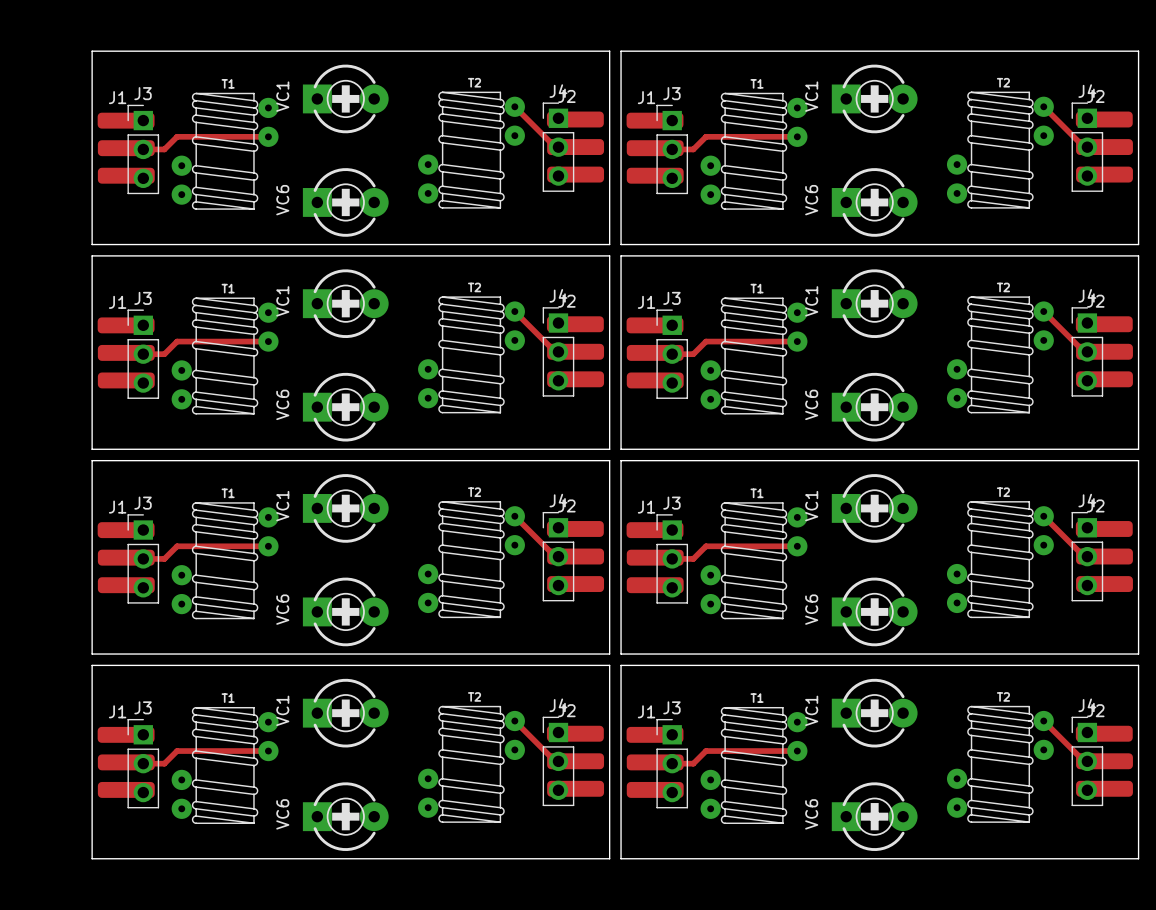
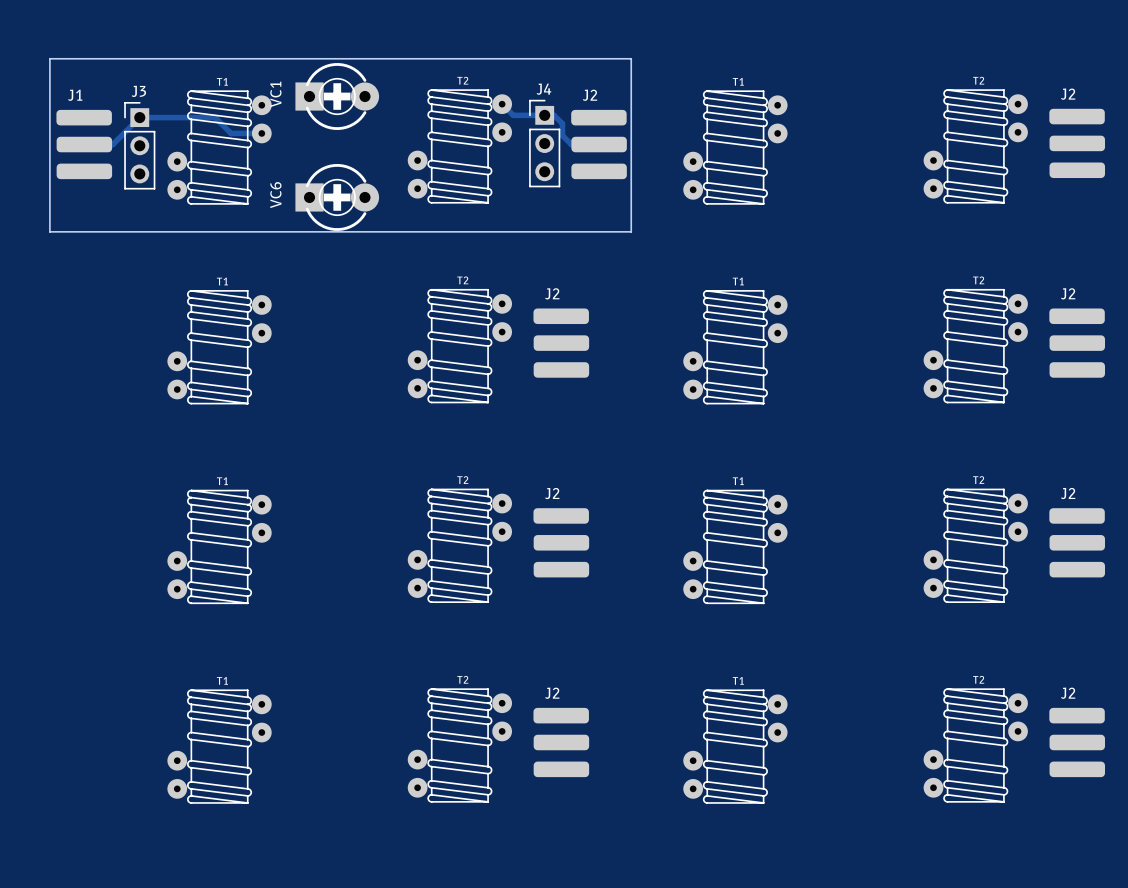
board edge: (92, 51) (92, 244) (609, 244) (609, 51) (92, 51) -> (49, 58) (49, 231) (631, 231) (631, 58) (49, 58)
board edge: (621, 51) (621, 244) (1138, 244) (1138, 51) (621, 51) -> none
VC1: (874, 98) -> none
track: (1043, 106) (1084, 147) (1087, 147) -> none
track: (526, 118) (555, 147) (558, 147) -> (513, 115) (554, 115) (562, 123) (562, 135) (571, 144) (599, 144)
track: (236, 136) (177, 136) (164, 149) (143, 149) -> (231, 133) (215, 117) (139, 117) (112, 144) (84, 144)
track: (797, 136) (706, 136) (693, 149) (672, 149) -> none
J2 position: (575, 147) -> (599, 144)
J4: (1087, 147) -> none
J1 position: (126, 148) -> (84, 144)
J1: (655, 148) -> none
J3: (672, 149) -> none
VC6: (874, 202) -> none
board edge: (92, 255) (92, 449) (609, 449) (609, 255) (92, 255) -> none
board edge: (621, 255) (621, 449) (1138, 449) (1138, 255) (621, 255) -> none
VC1: (345, 303) -> none
VC1: (874, 303) -> none
track: (514, 311) (555, 351) (558, 351) -> none
track: (1043, 311) (1084, 351) (1087, 351) -> none
track: (268, 341) (177, 341) (164, 354) (143, 354) -> none
track: (797, 341) (706, 341) (693, 354) (672, 354) -> none
J4: (558, 351) -> none
J4: (1087, 351) -> none
J1: (126, 352) -> none
J1: (655, 352) -> none
J3: (143, 354) -> none
J3: (672, 354) -> none
VC6: (345, 407) -> none
VC6: (874, 407) -> none
board edge: (92, 460) (609, 460) (609, 654) (92, 654) (92, 460) -> none
board edge: (621, 460) (1138, 460) (1138, 654) (621, 654) (621, 460) -> none
VC1: (345, 508) -> none
VC1: (874, 508) -> none
track: (514, 516) (555, 556) (558, 556) -> none
track: (1043, 516) (1084, 556) (1087, 556) -> none
track: (268, 546) (177, 546) (164, 558) (143, 558) -> none
track: (797, 546) (706, 546) (693, 558) (672, 558) -> none
J4: (558, 556) -> none
J4: (1087, 556) -> none
J1: (126, 557) -> none
J1: (655, 557) -> none
J3: (143, 558) -> none
J3: (672, 558) -> none
VC6: (345, 611) -> none
VC6: (874, 611) -> none
board edge: (92, 665) (609, 665) (609, 858) (92, 858) (92, 665) -> none
board edge: (621, 665) (1138, 665) (1138, 858) (621, 858) (621, 665) -> none
VC1: (345, 713) -> none
VC1: (874, 713) -> none
track: (514, 721) (555, 761) (558, 761) -> none
track: (1043, 721) (1084, 761) (1087, 761) -> none
track: (268, 751) (177, 751) (164, 763) (143, 763) -> none
track: (797, 751) (706, 751) (693, 763) (672, 763) -> none
J4: (558, 761) -> none
J4: (1087, 761) -> none
J1: (126, 762) -> none
J1: (655, 762) -> none
J3: (143, 763) -> none
J3: (672, 763) -> none
VC6: (345, 816) -> none
VC6: (874, 816) -> none

